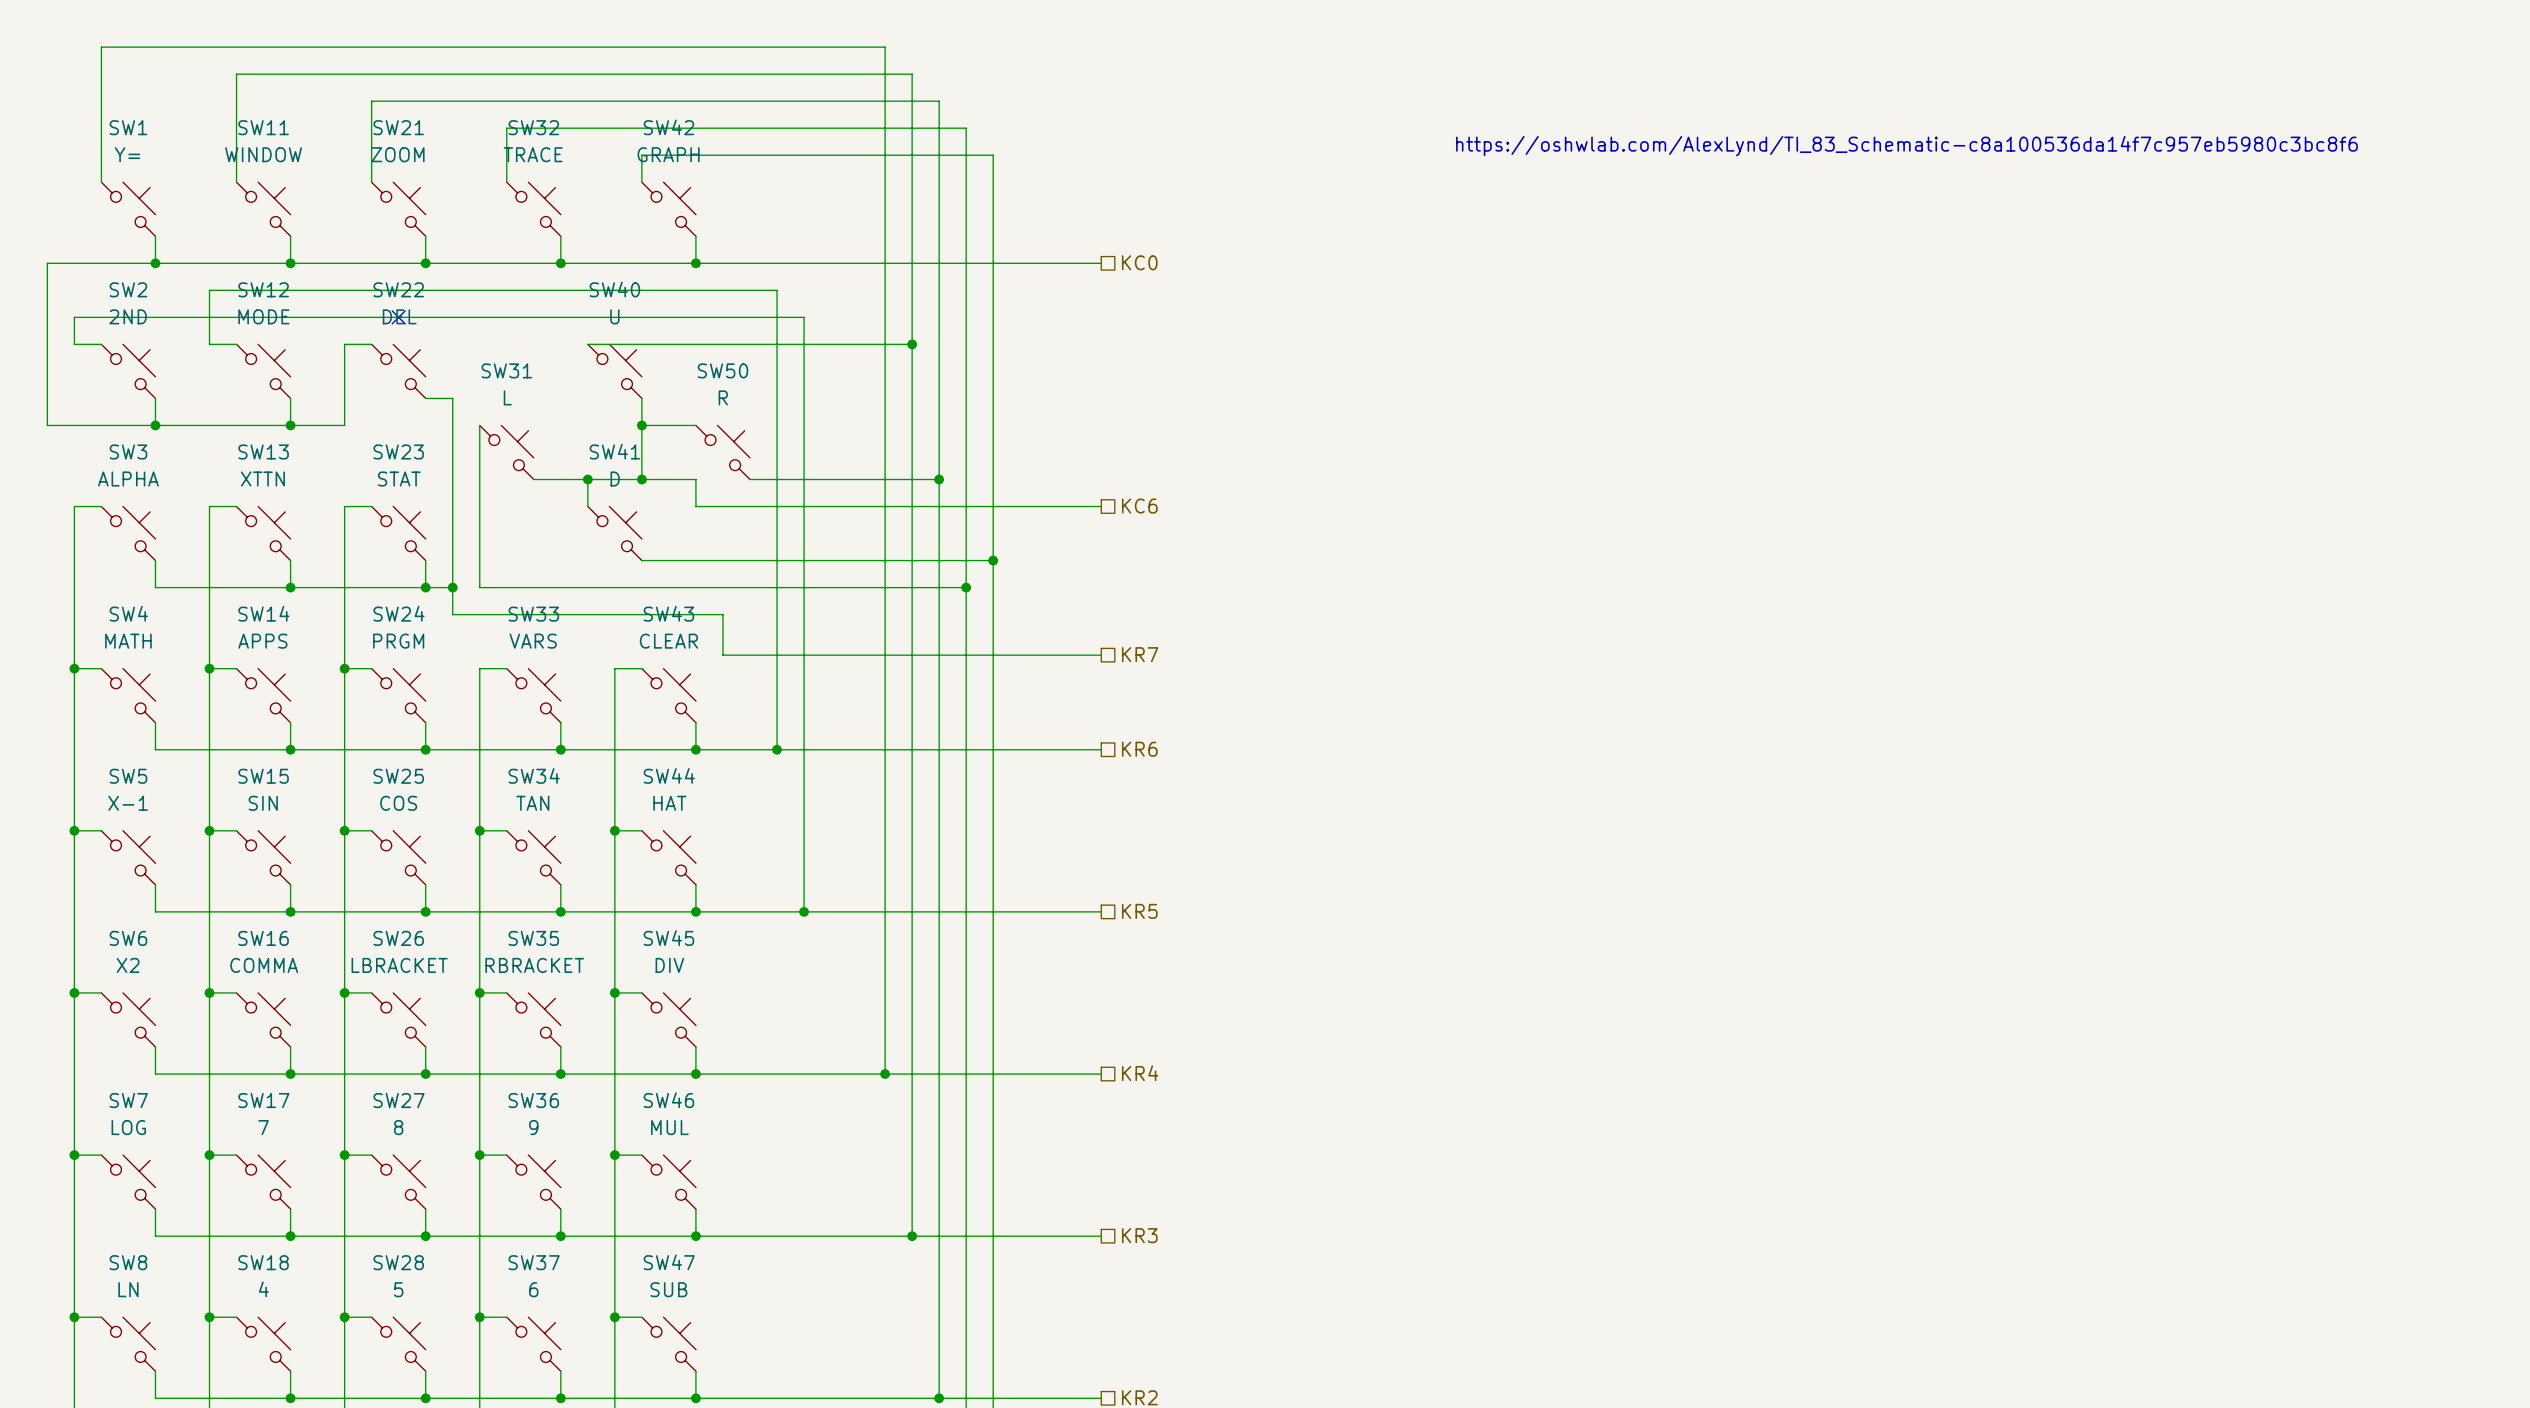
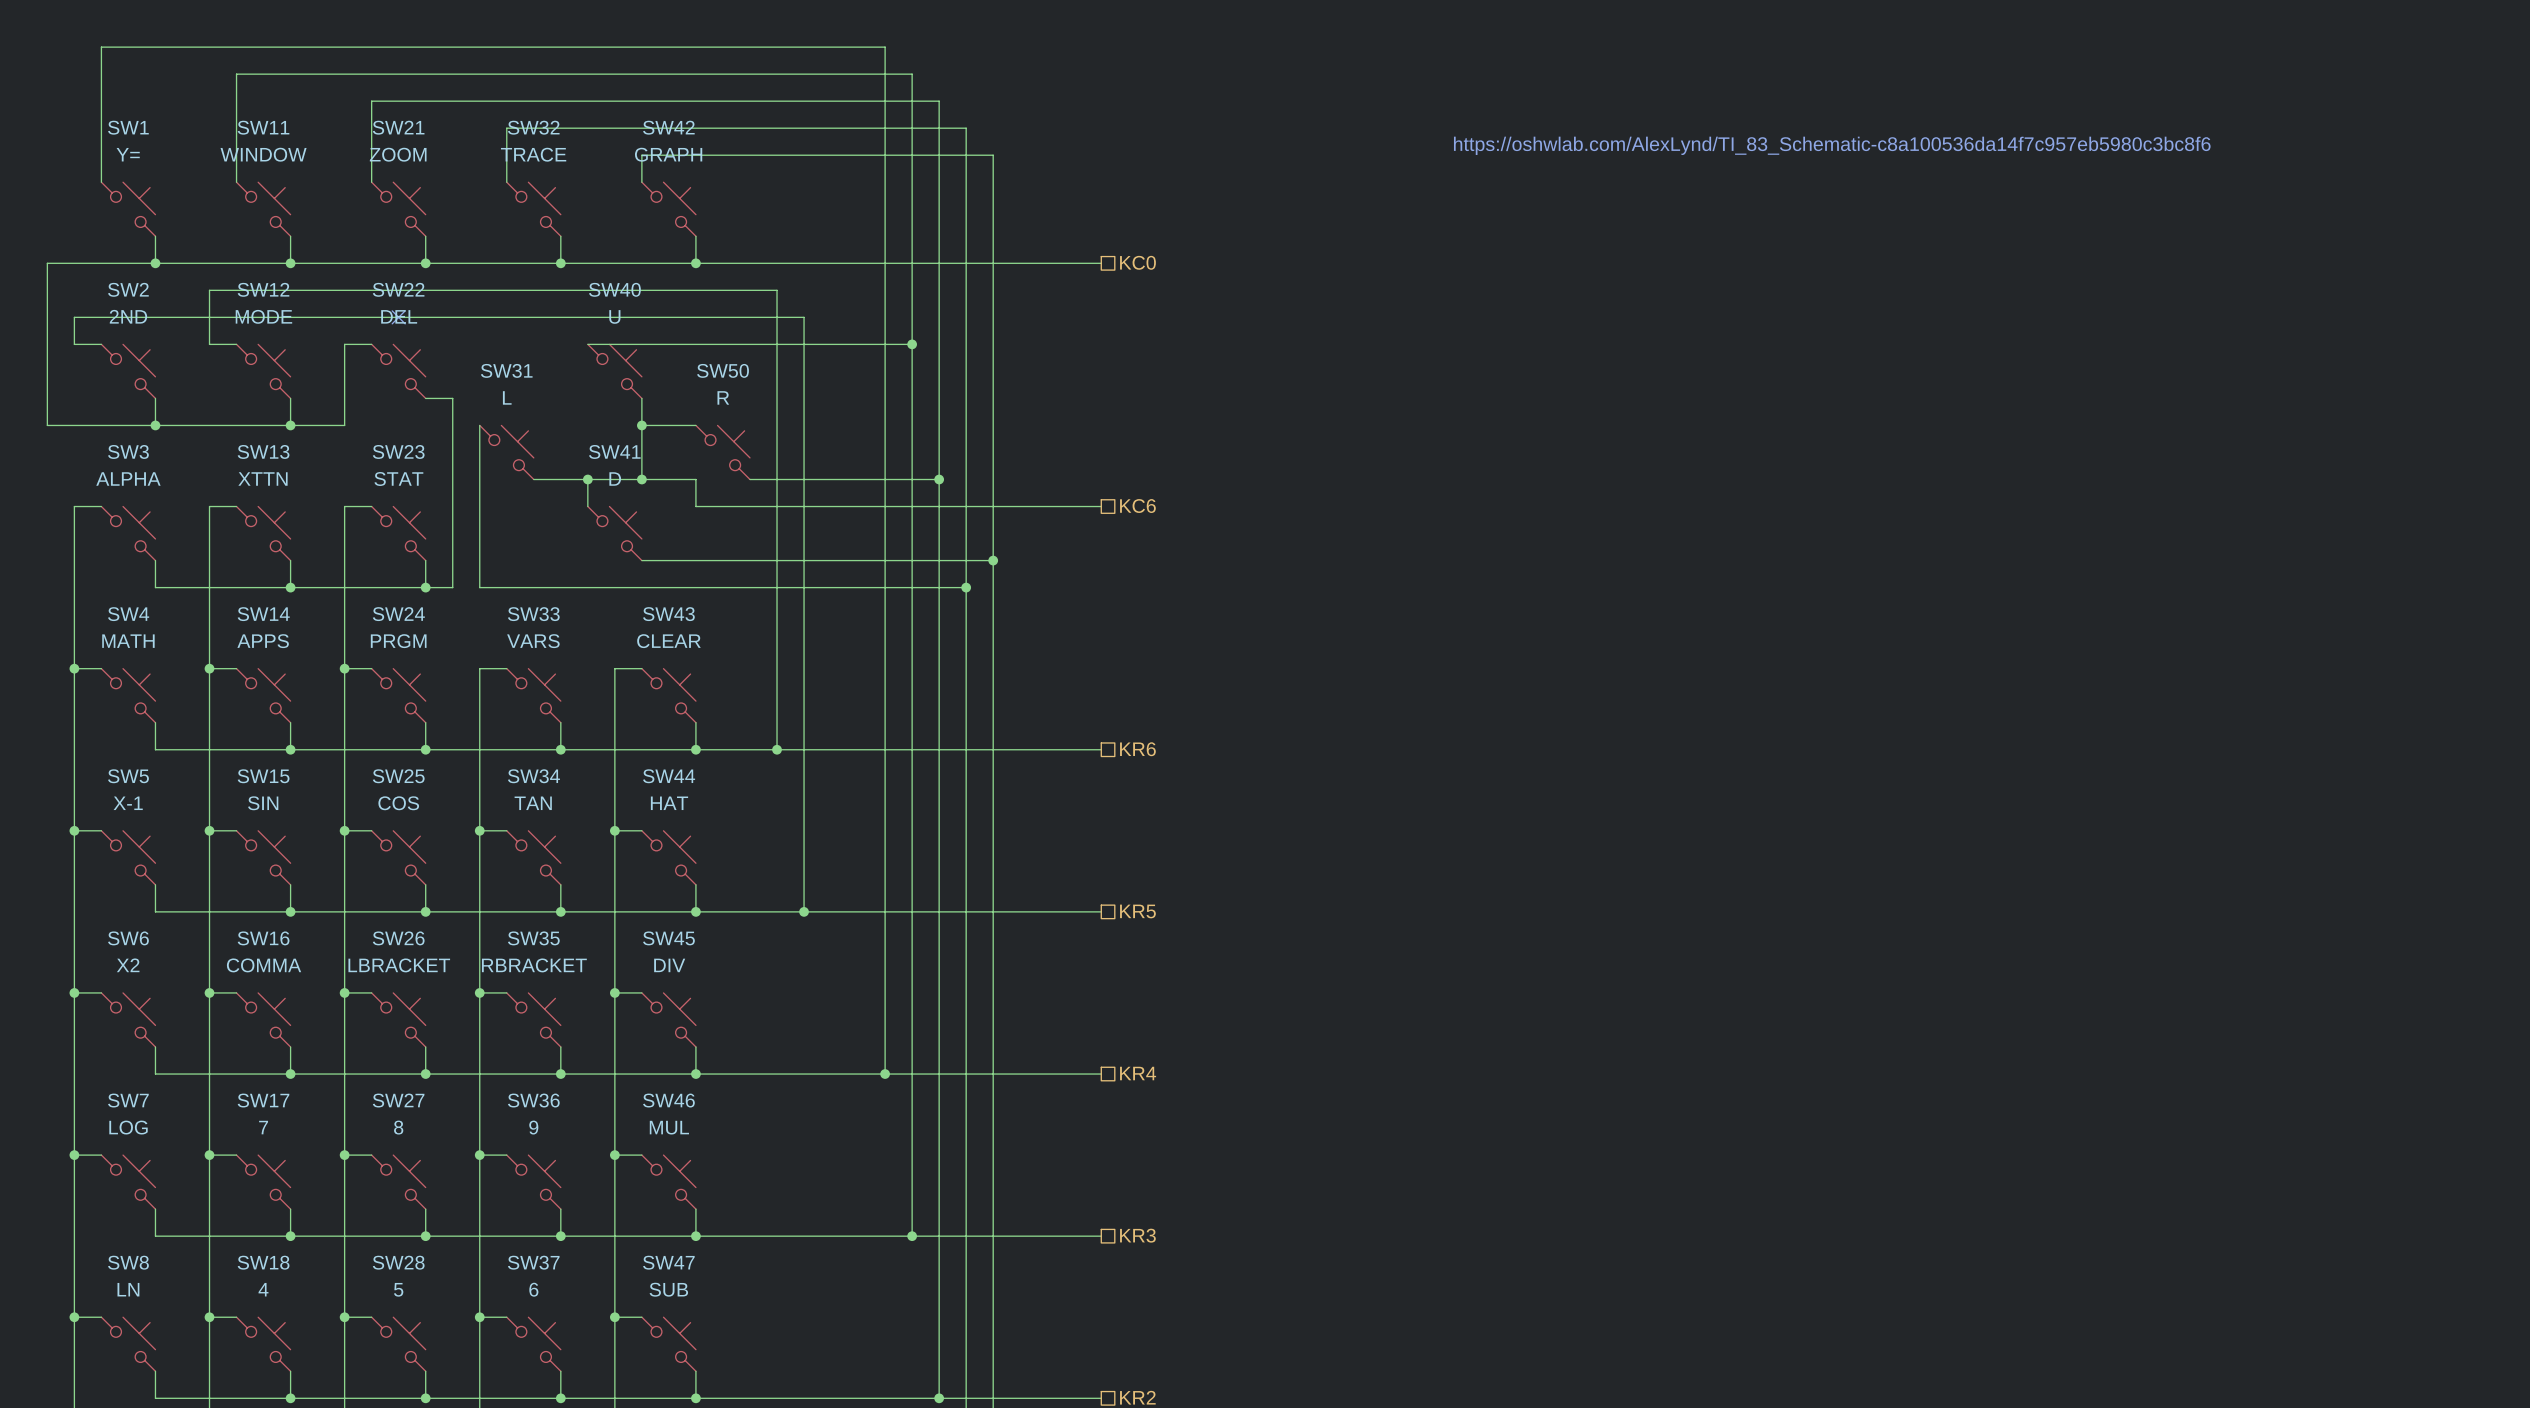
wire: (452, 587) (452, 614) (722, 614) (722, 655) (1101, 655) -> none
junction: (452, 587) -> none
hierarchical label: KR7 (1140, 654) -> none

